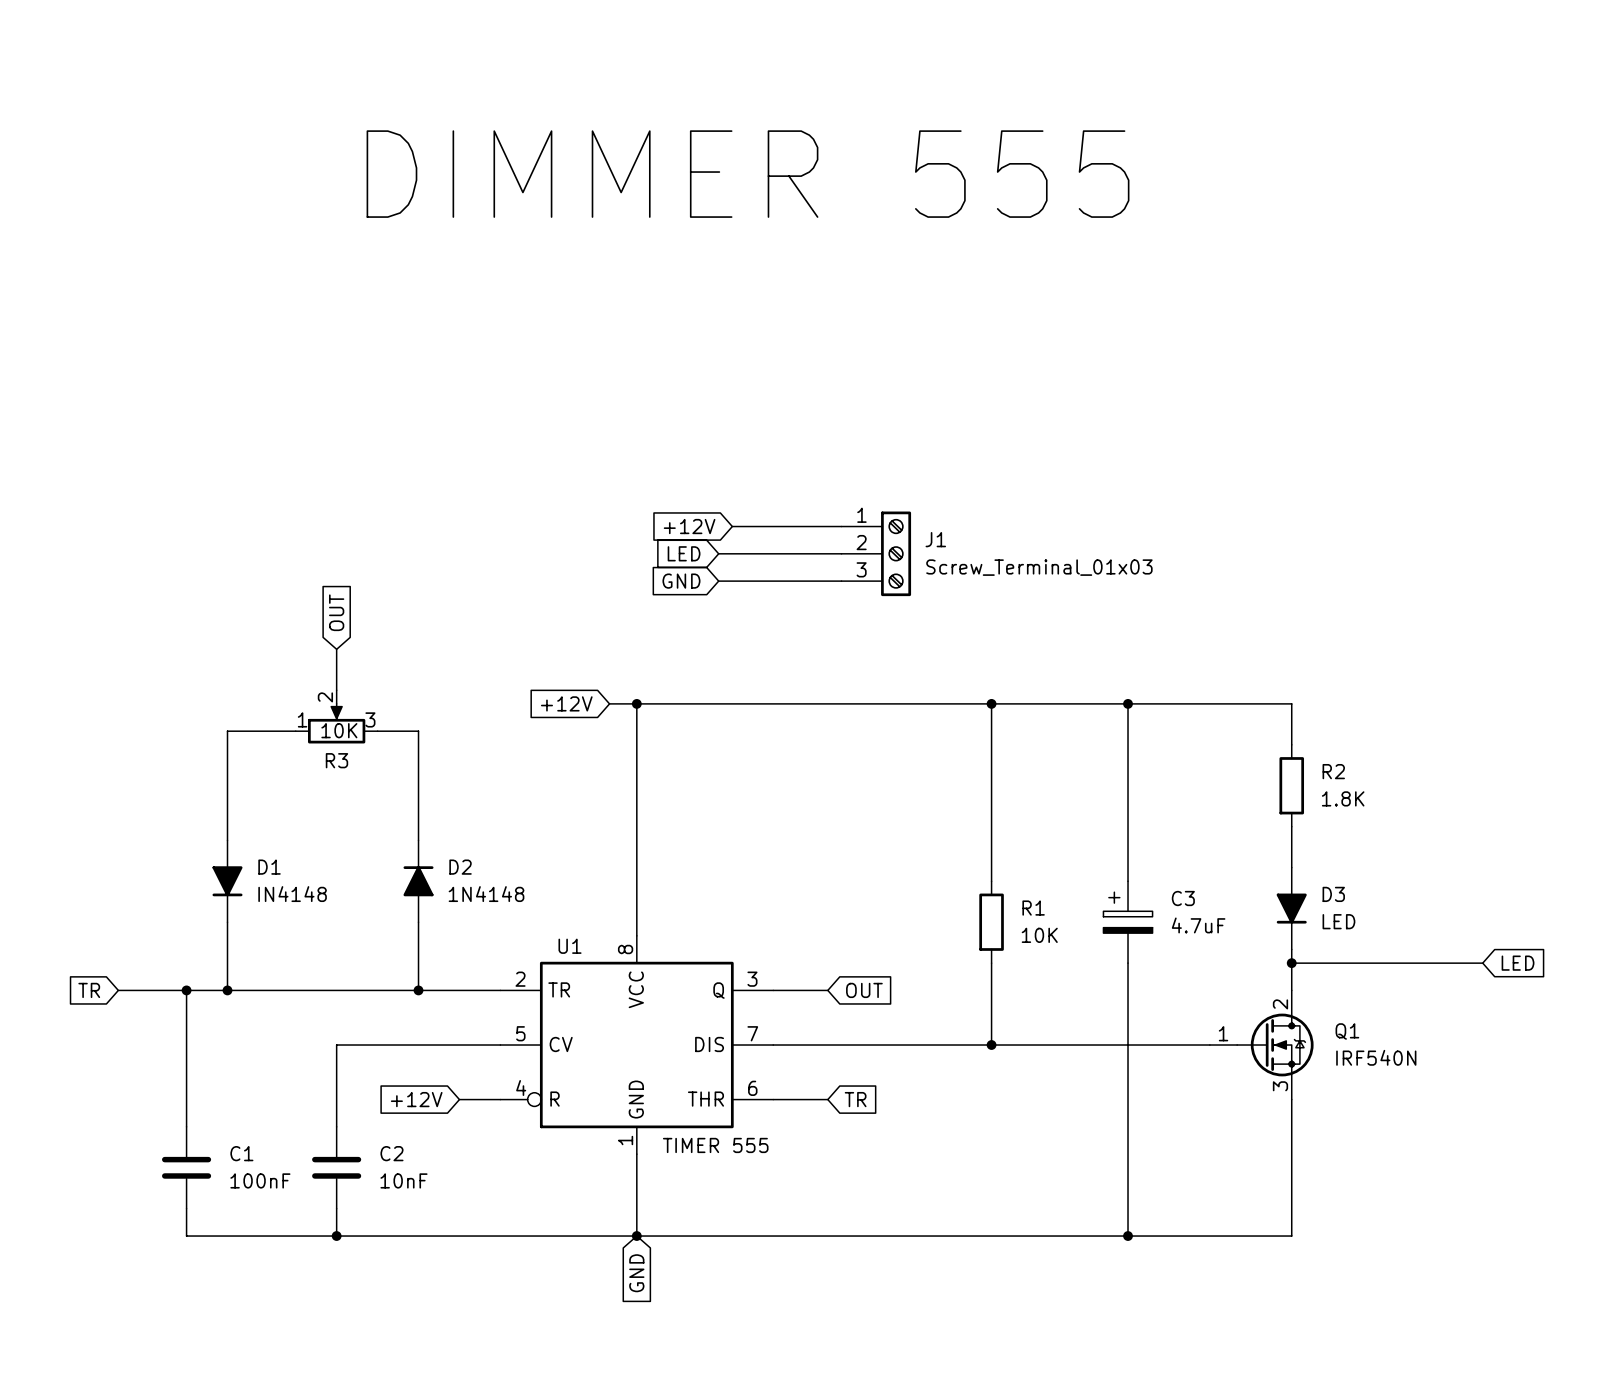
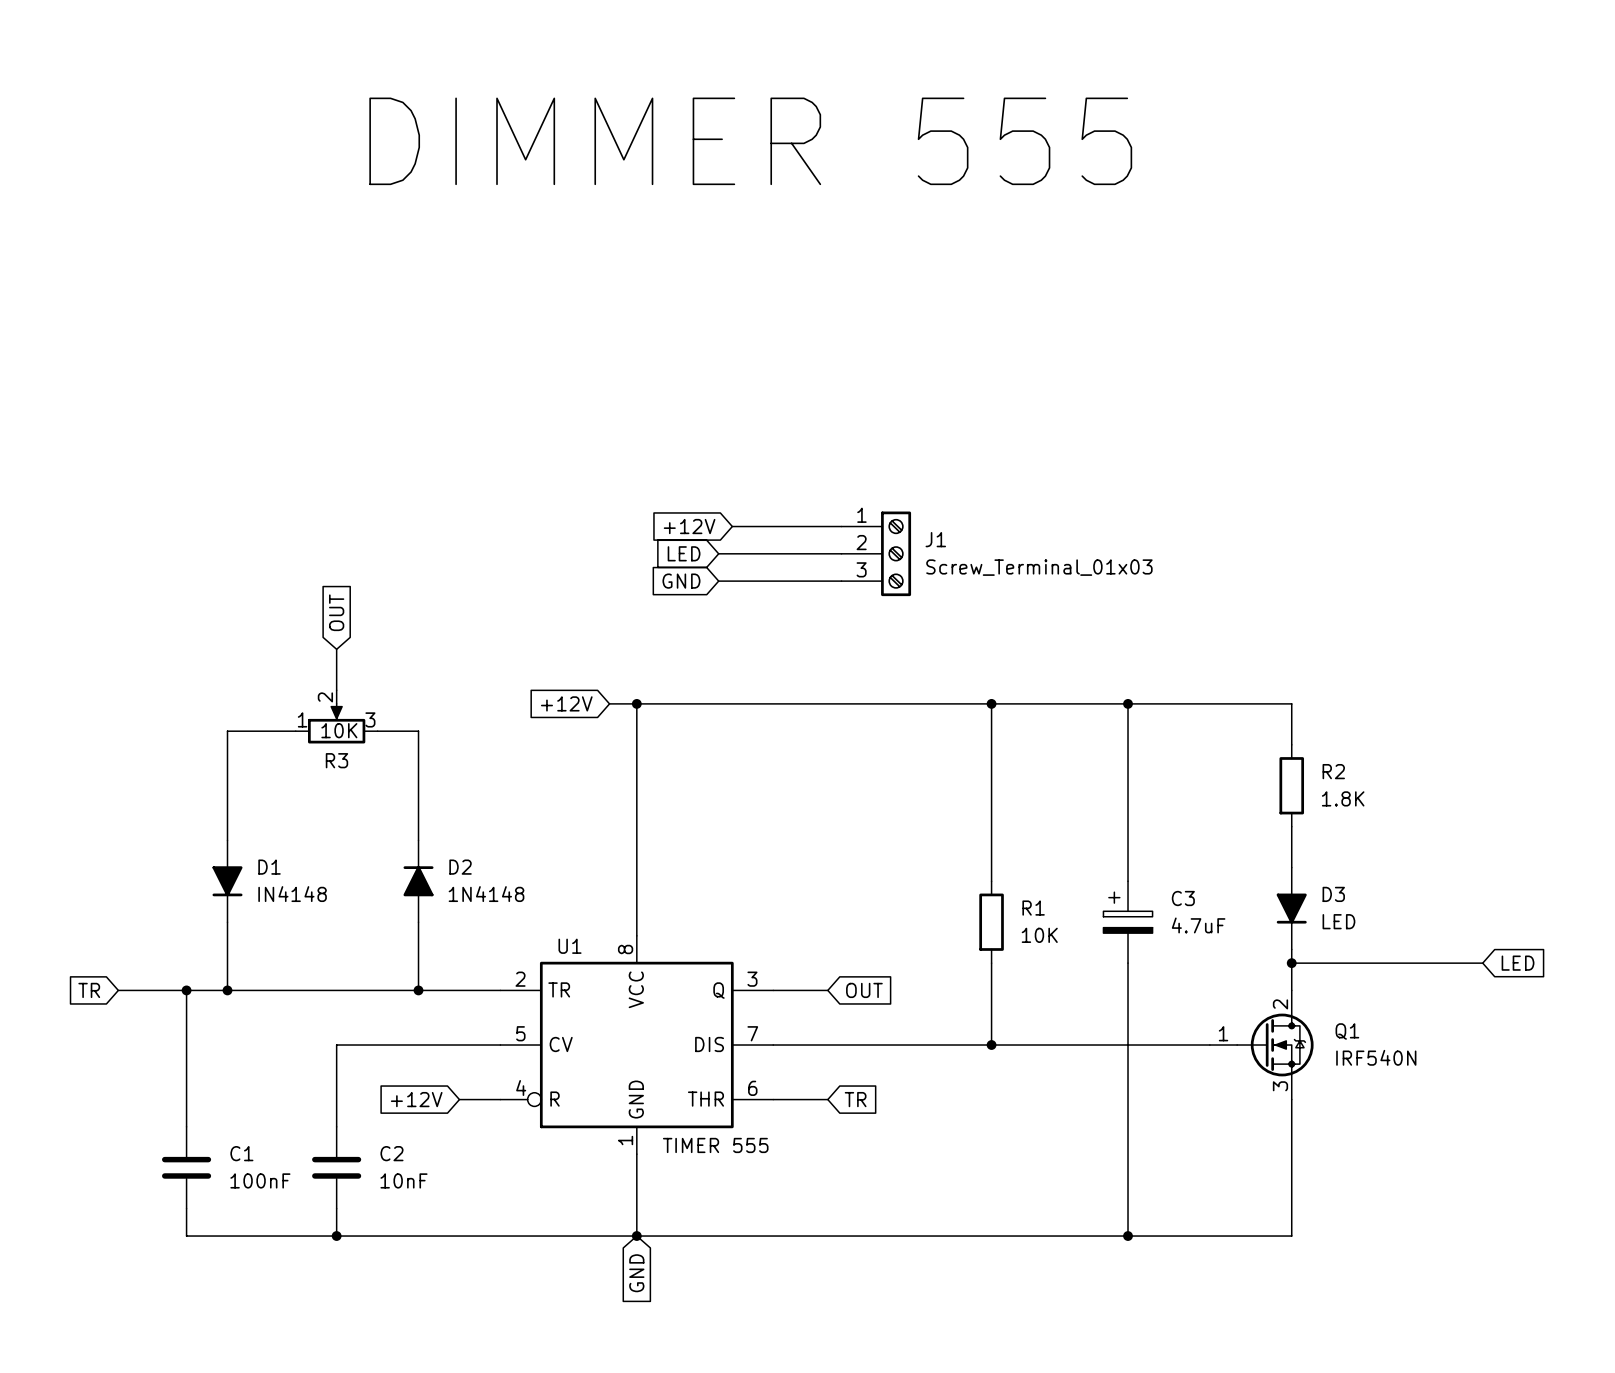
text position: DIMMER 555 (748, 174) -> DIMMER 555 (750, 141)

